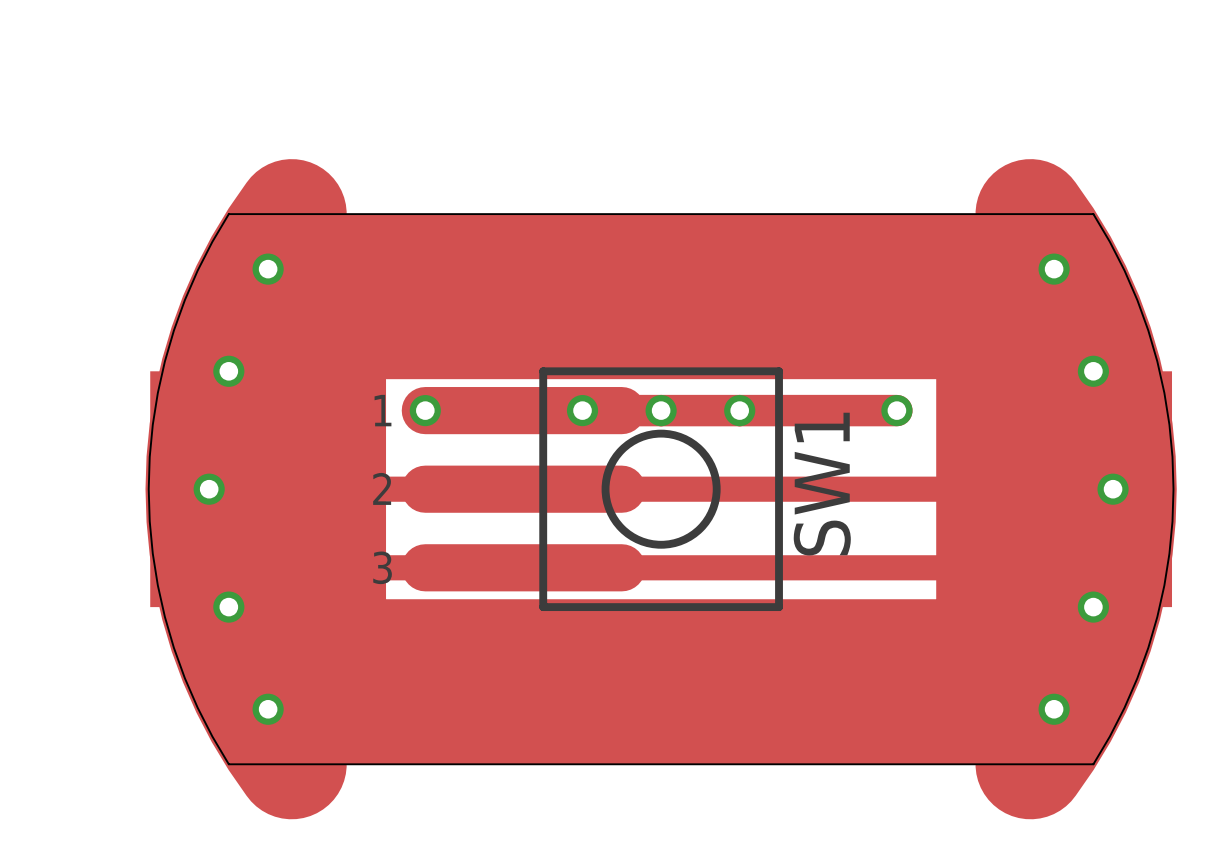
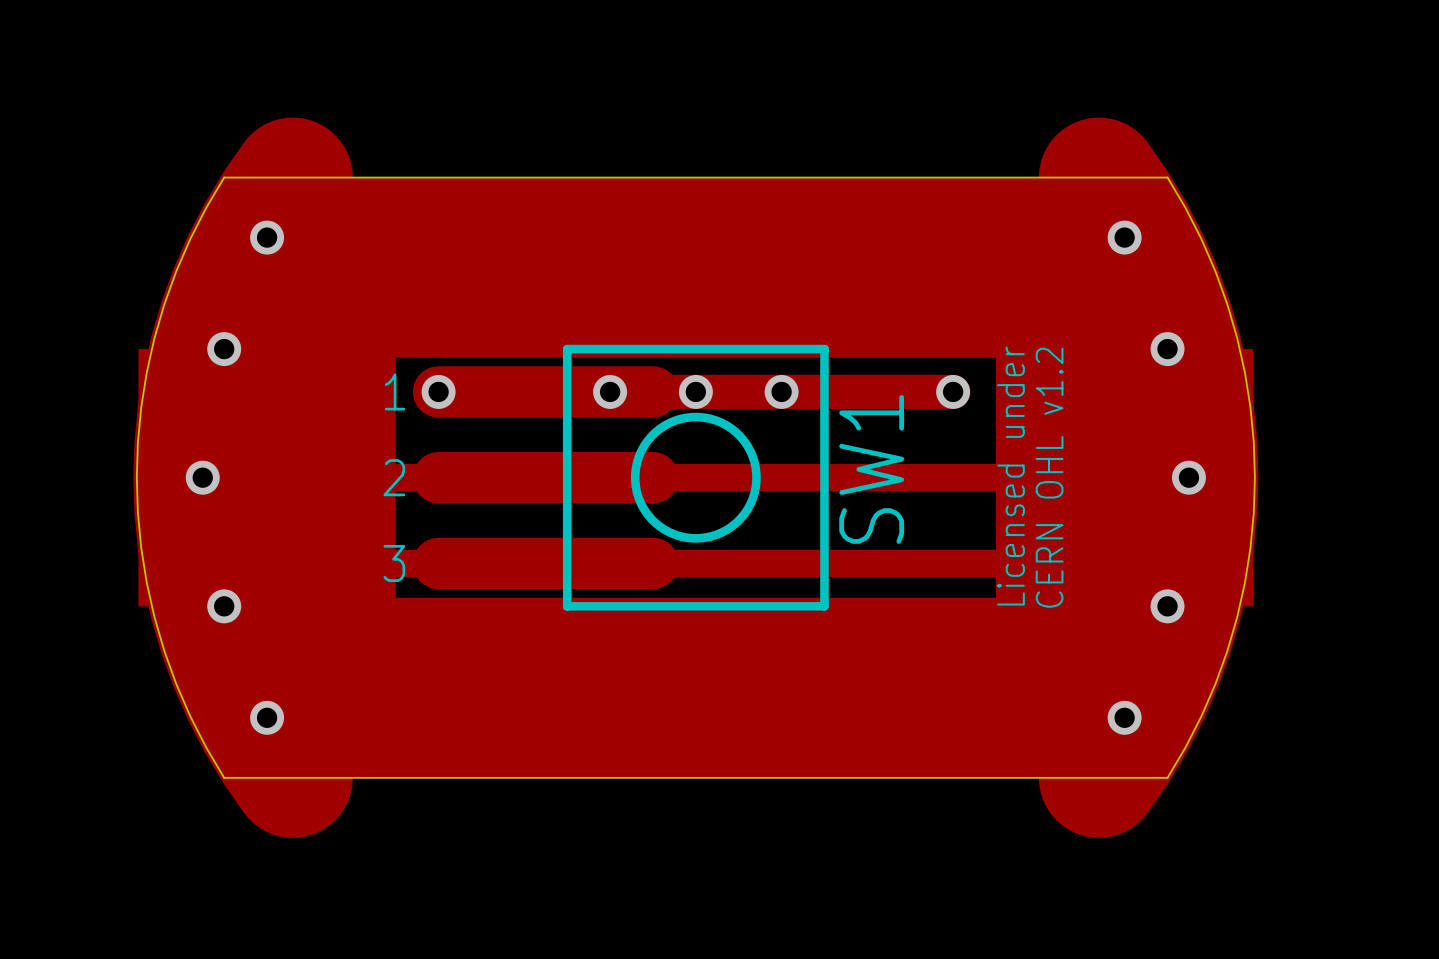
text: none -> Licensed under (1011, 476)
text: none -> CERN OHL v1.2 (1049, 477)

